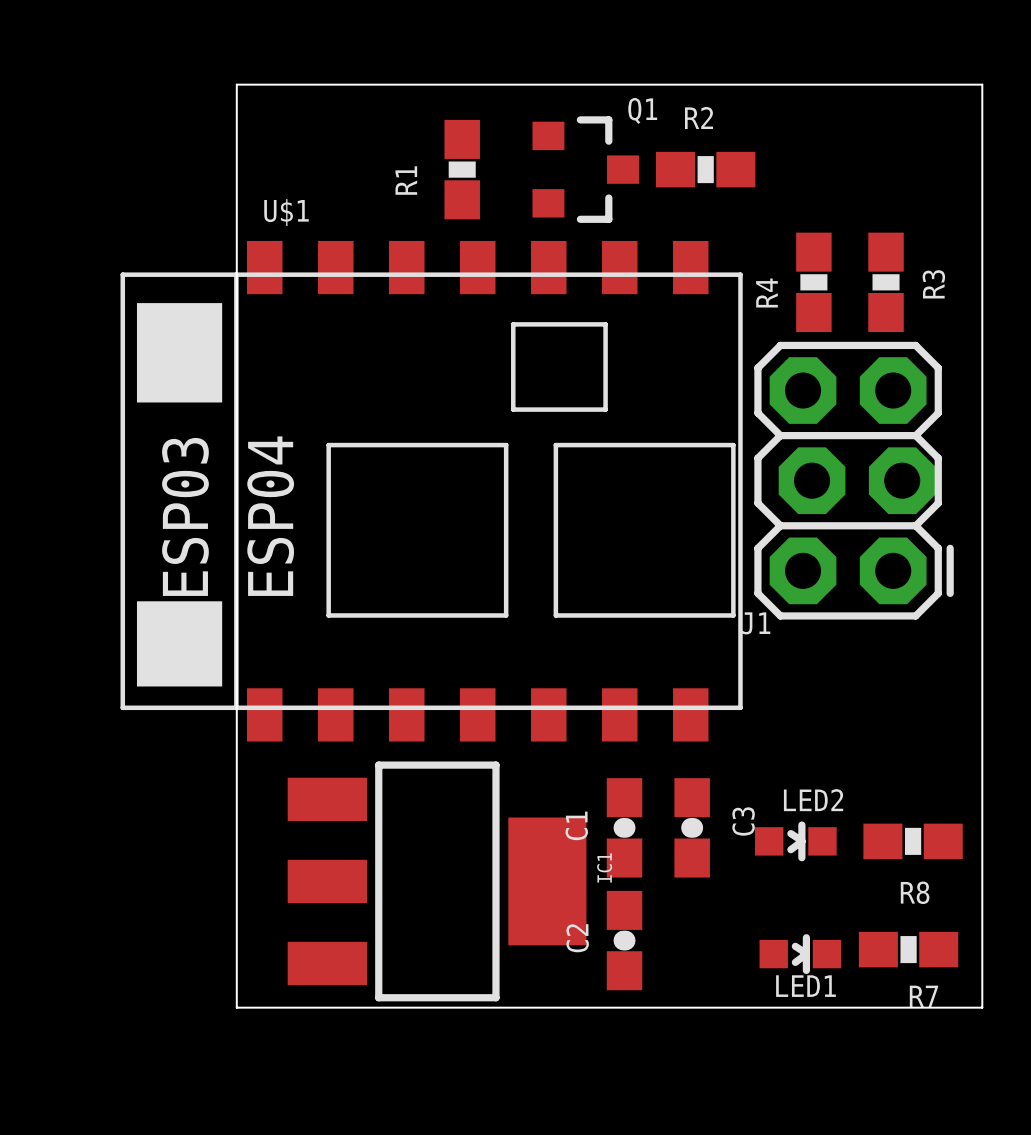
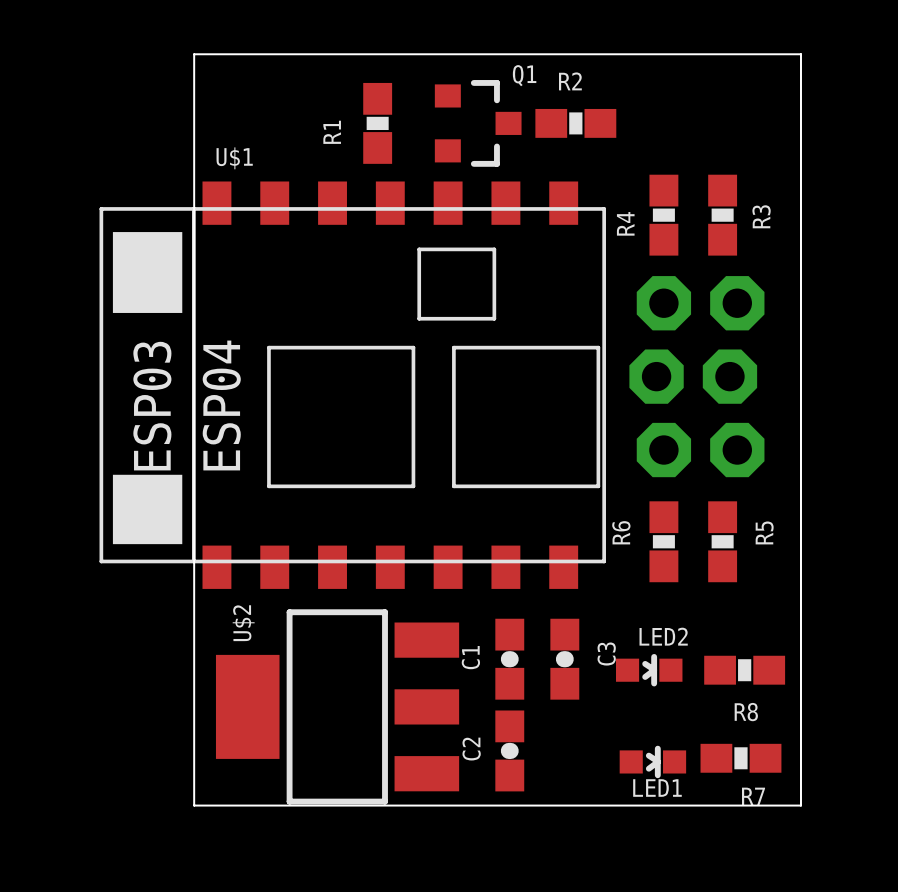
J1 side: top (854, 480) -> bottom (696, 376)
R6: none -> (663, 541)
R5: none -> (722, 541)
IC1: (437, 881) -> none
U$2: none -> (337, 706)

